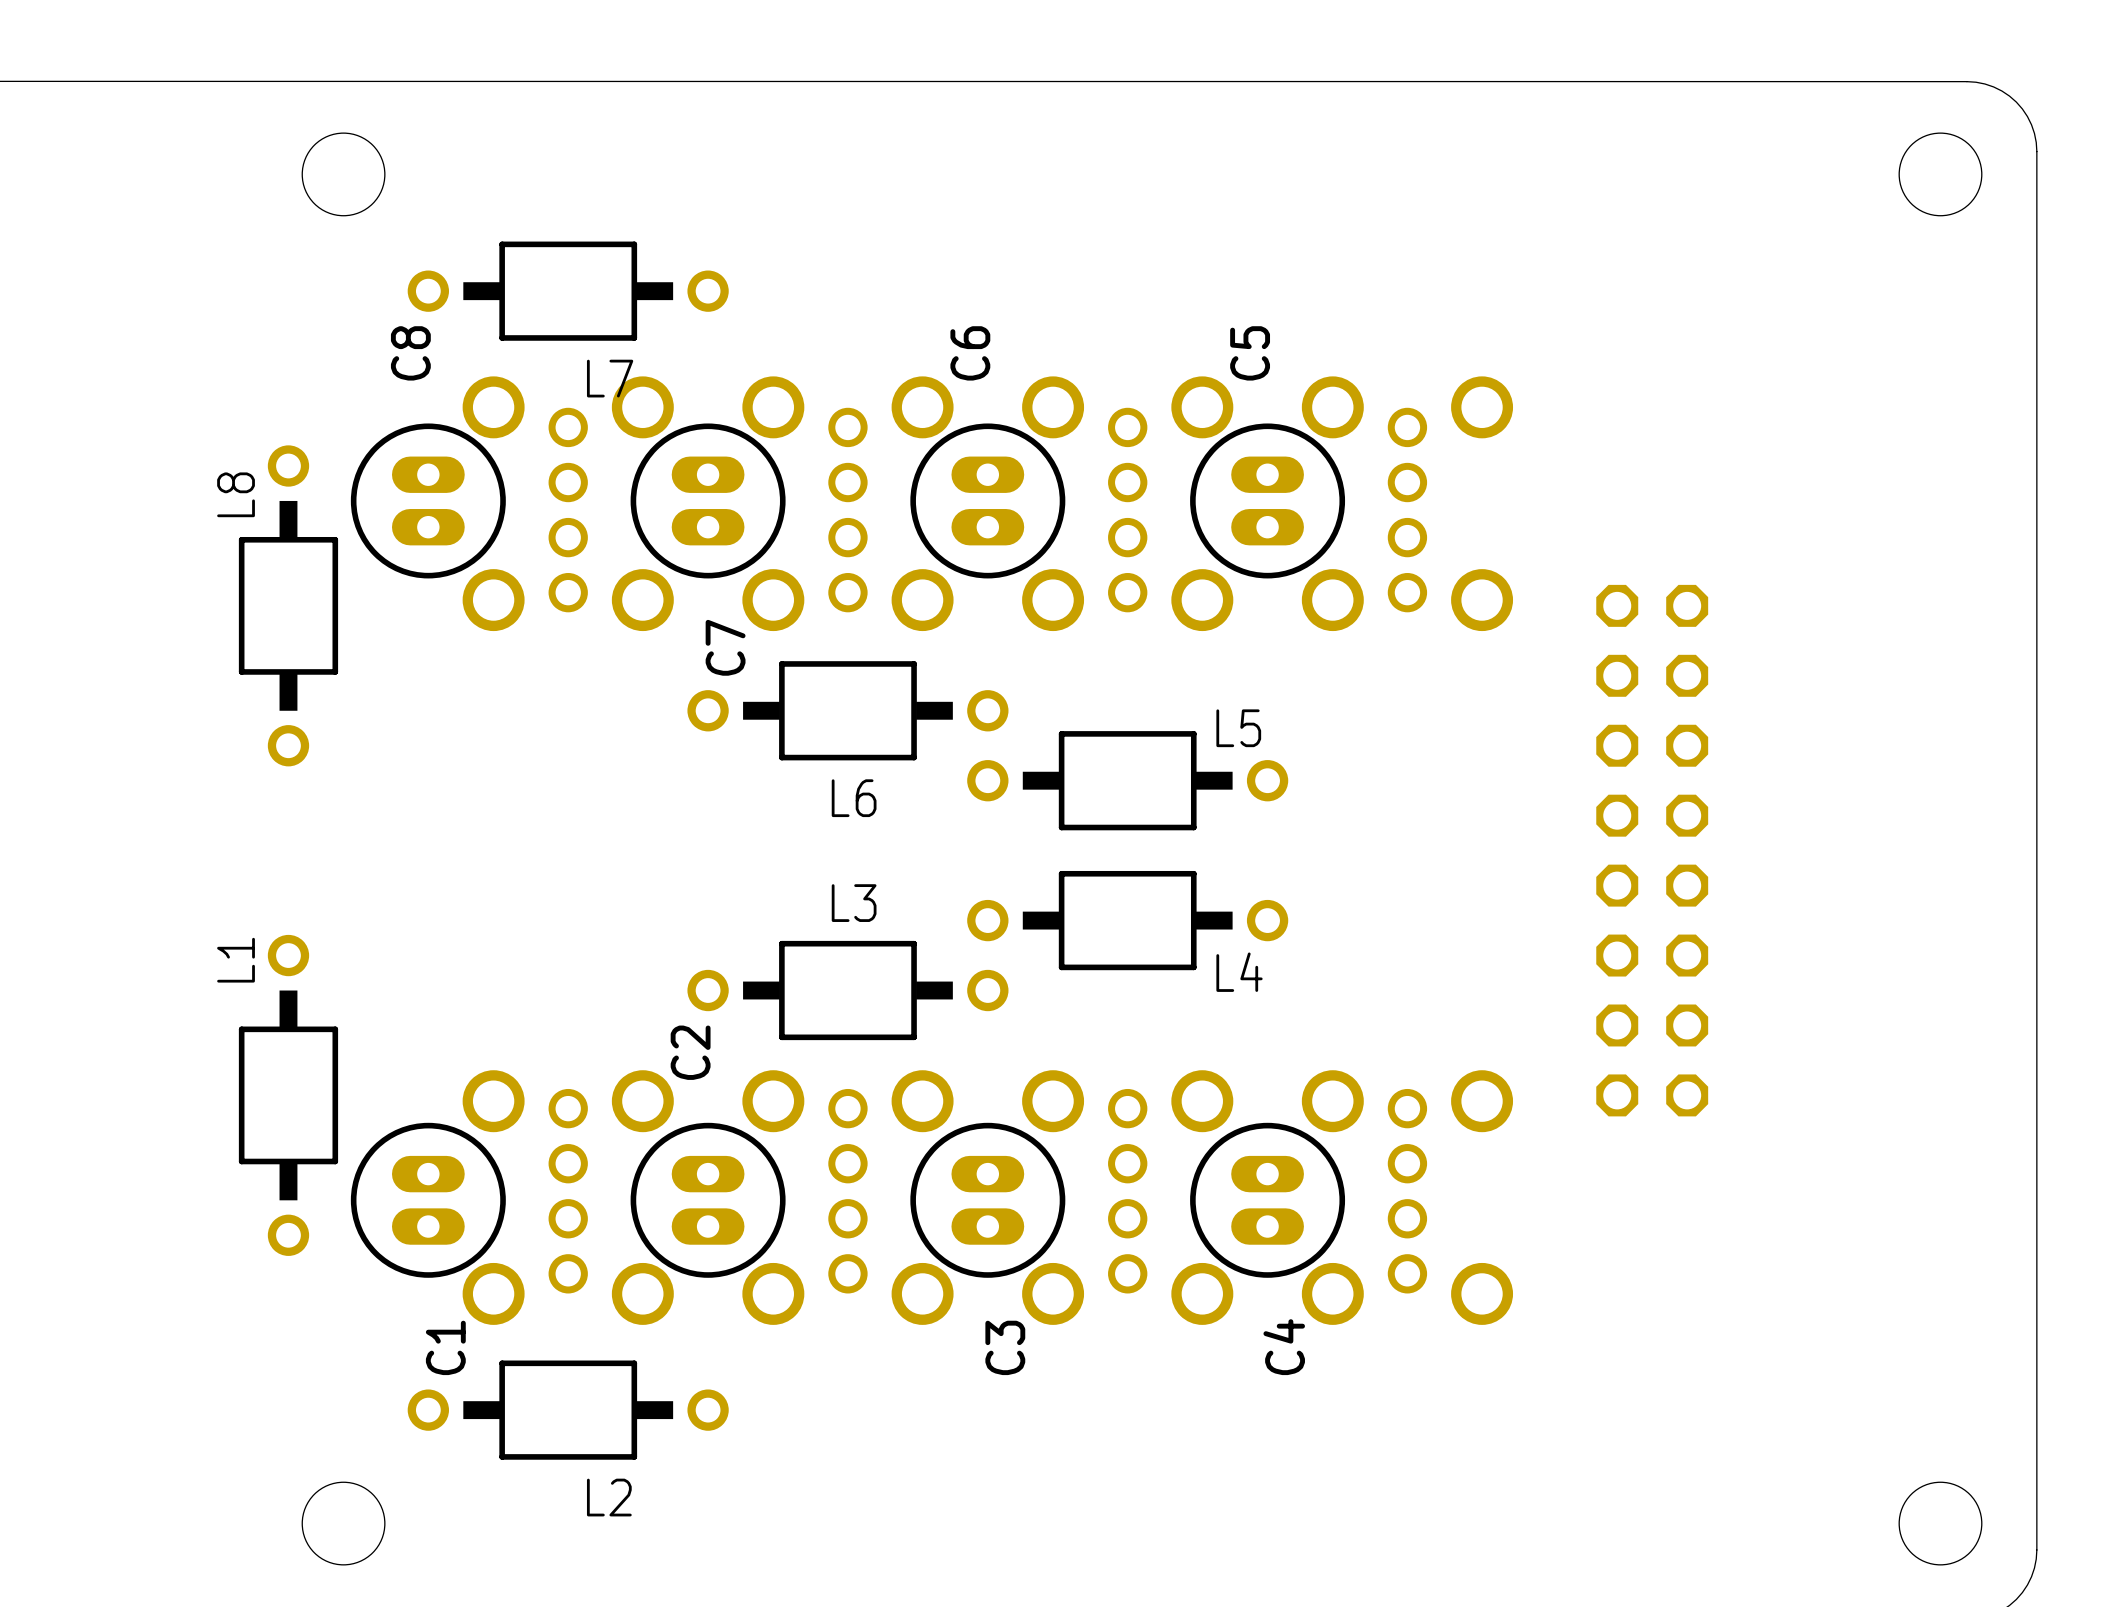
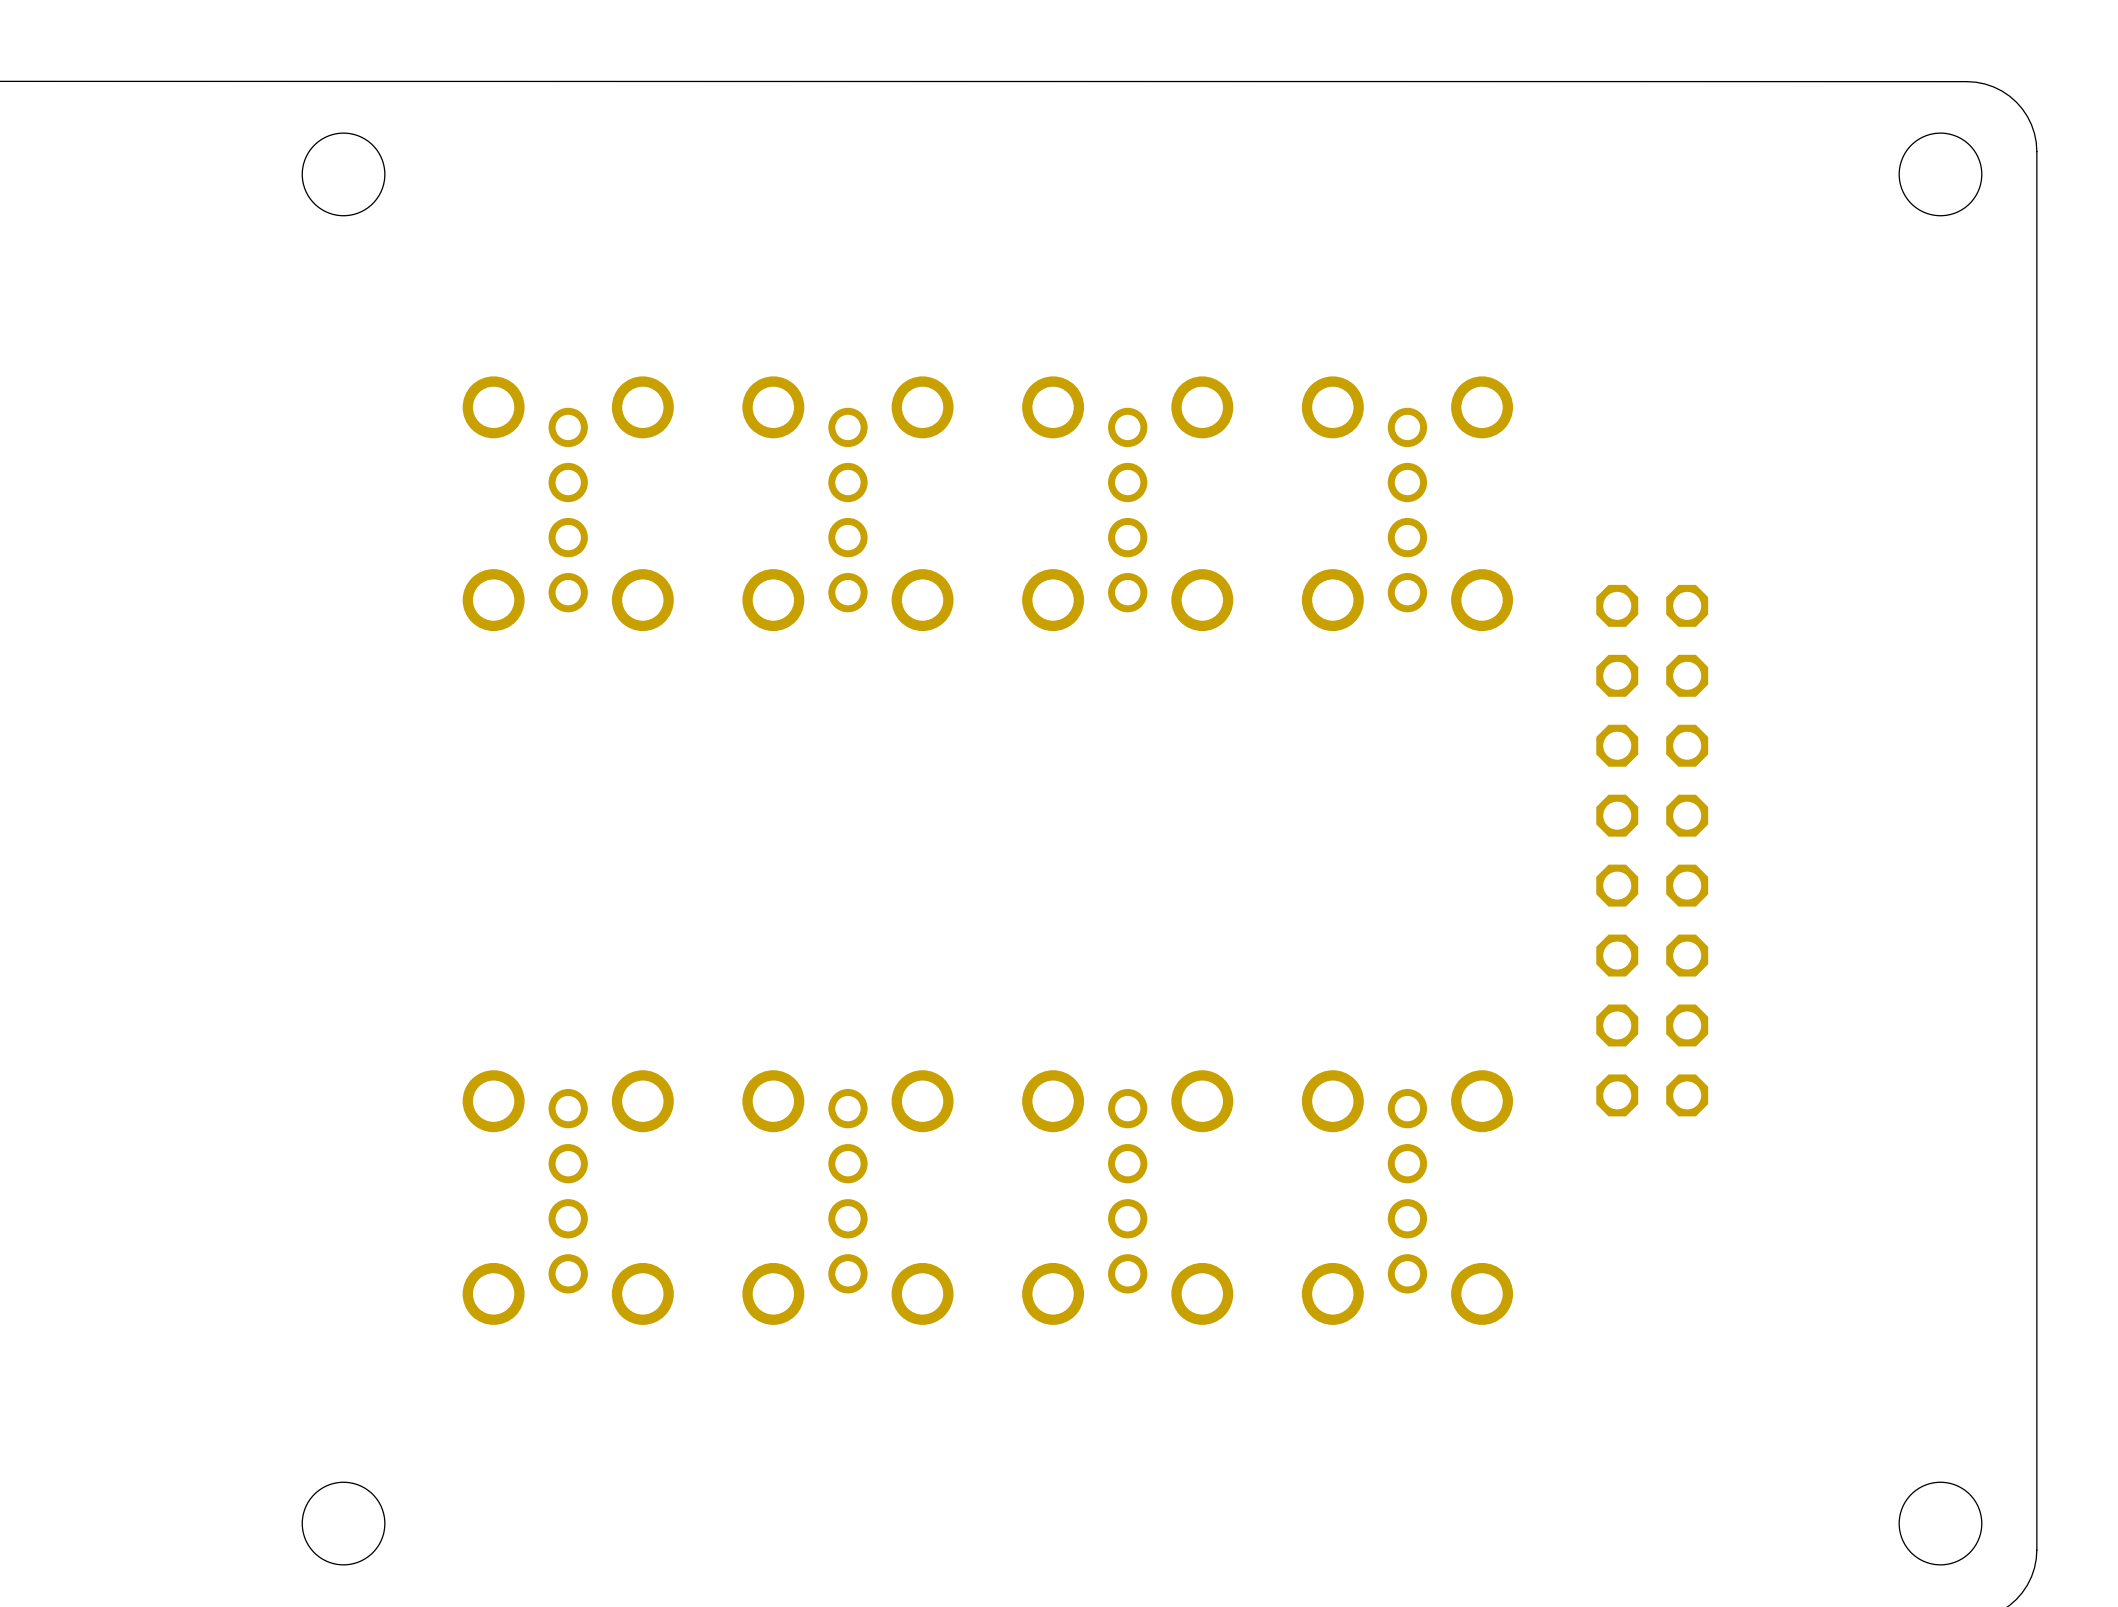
L7: (568, 291) -> none
C8: (428, 500) -> none
C7: (708, 500) -> none
C6: (987, 500) -> none
C5: (1267, 500) -> none
L8: (288, 605) -> none
L6: (847, 710) -> none
L5: (1127, 780) -> none
L4: (1127, 920) -> none
L3: (847, 990) -> none
L1: (288, 1095) -> none
C1: (428, 1200) -> none
C2: (708, 1200) -> none
C3: (987, 1200) -> none
C4: (1267, 1200) -> none
L2: (568, 1410) -> none

